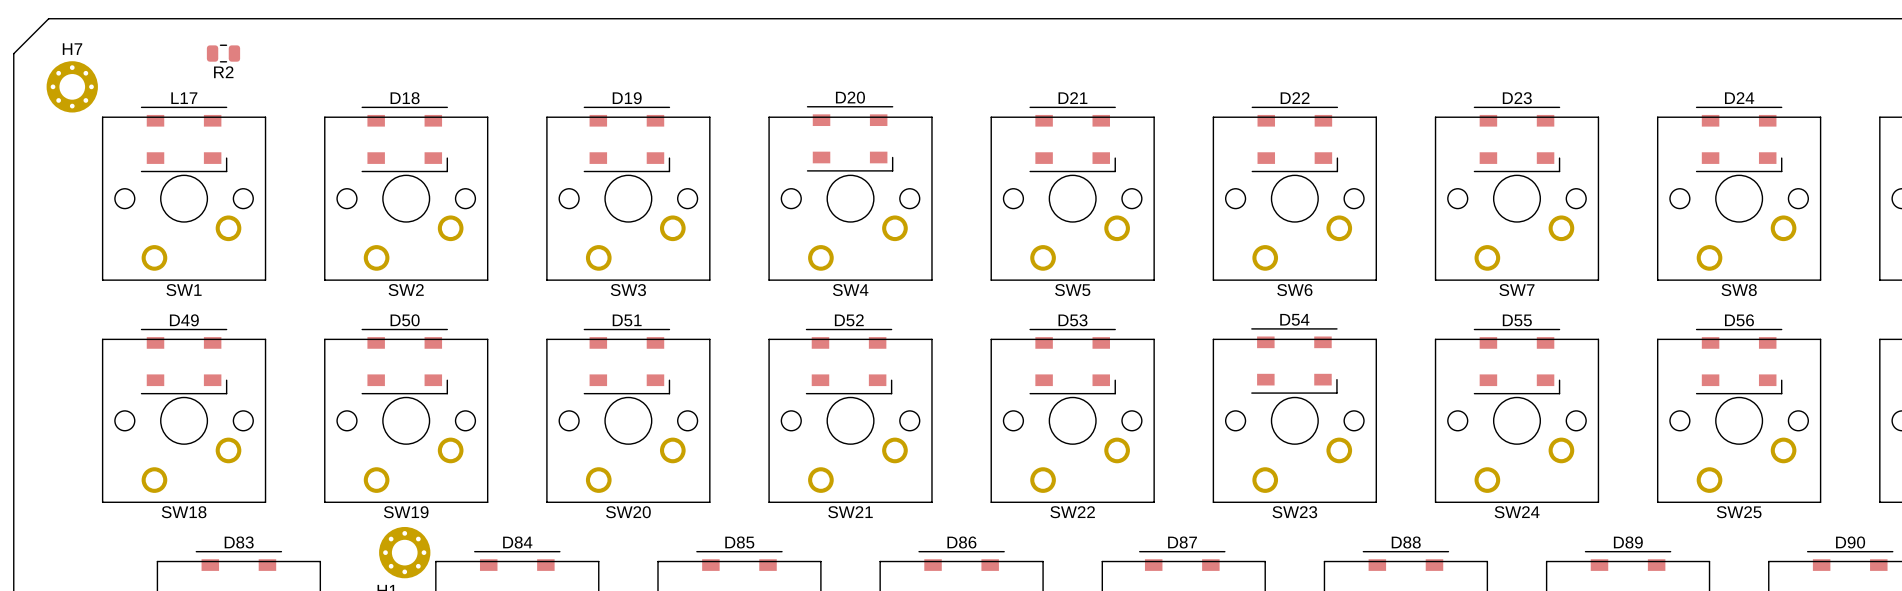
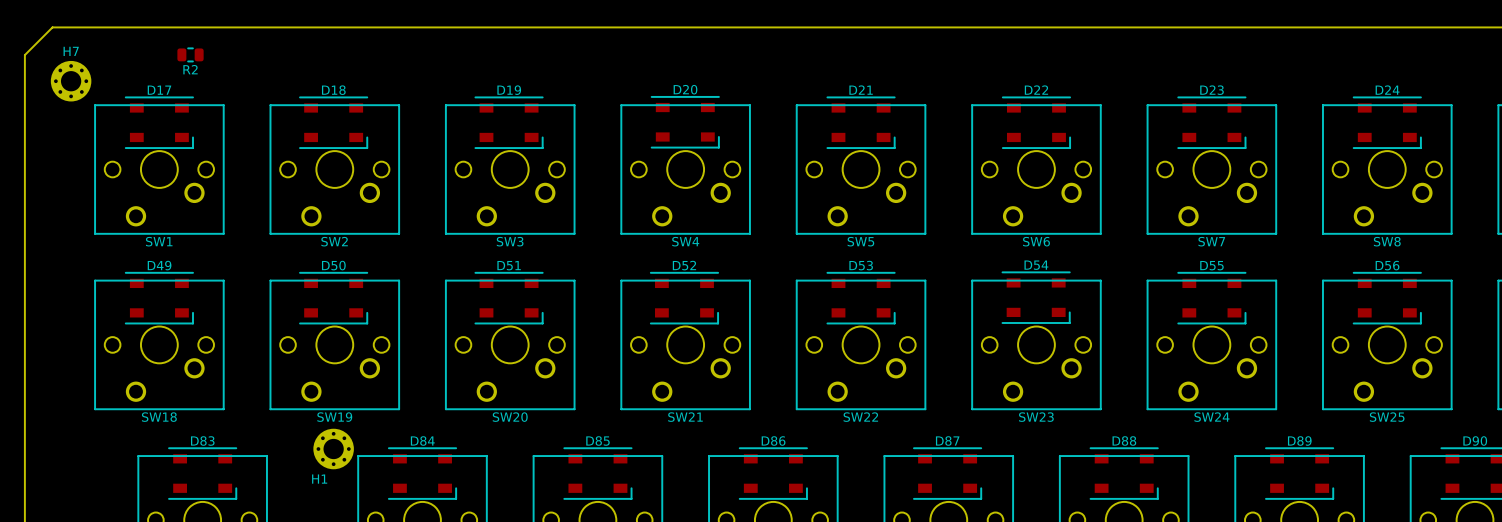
L17 name: L17 (184, 98) -> D17 (159, 90)

